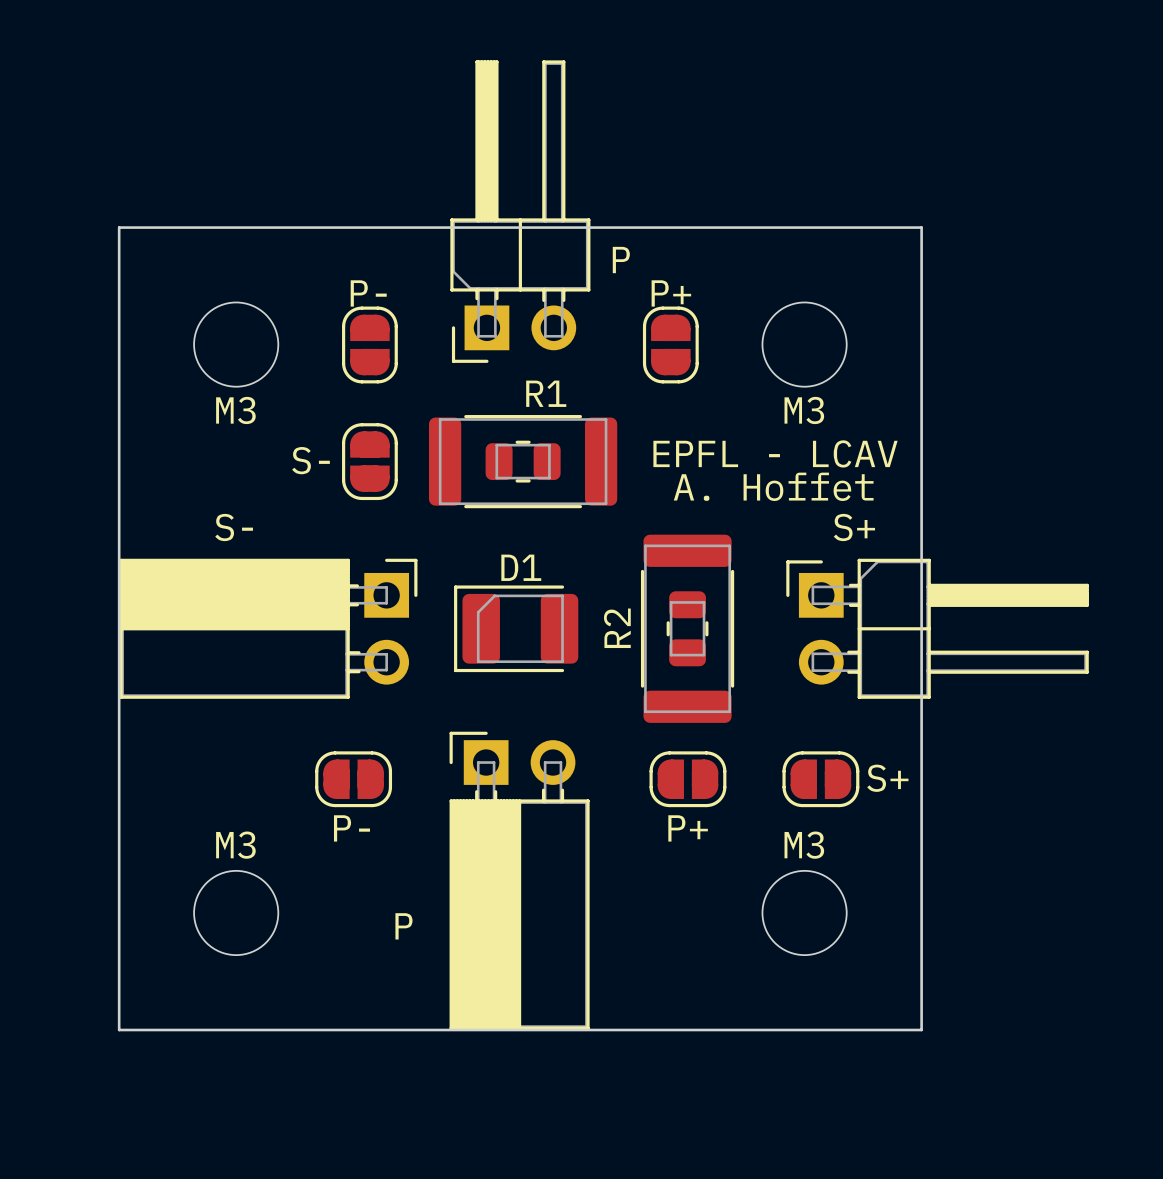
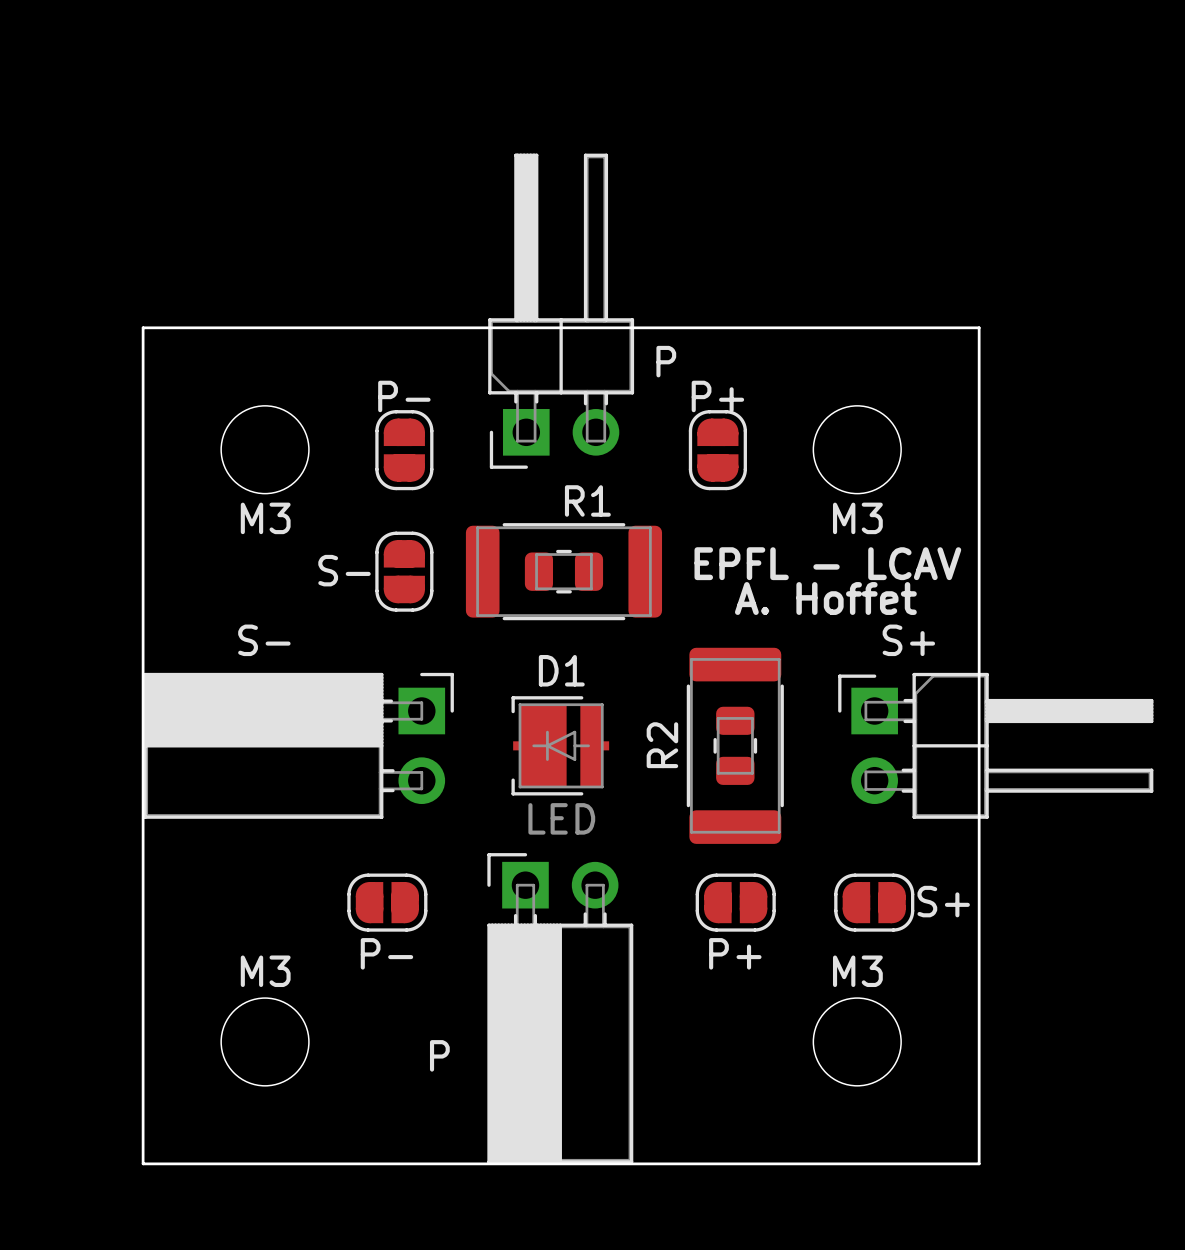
D1 footprint: [454, 585, 579, 673] -> [511, 696, 610, 796]
D1 value: none -> LED (561, 818)

